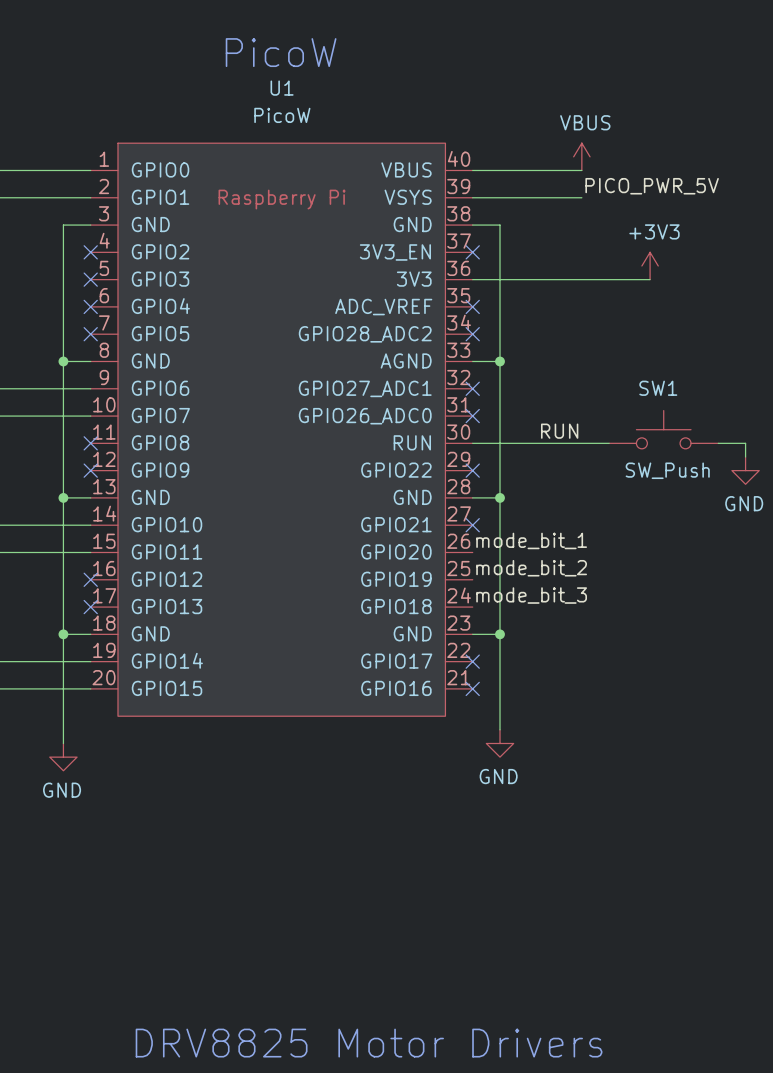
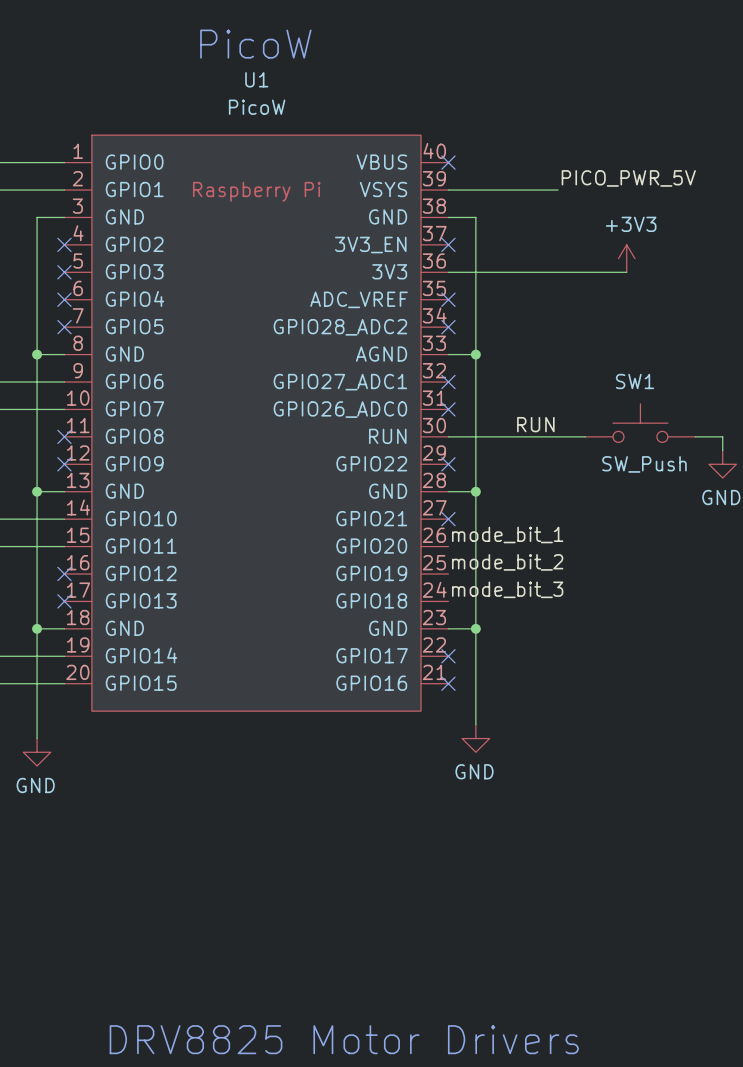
power symbol: VBUS (581, 156) -> none
wire: (472, 170) (581, 170) -> none
no-connect mark: none -> (448, 162)

